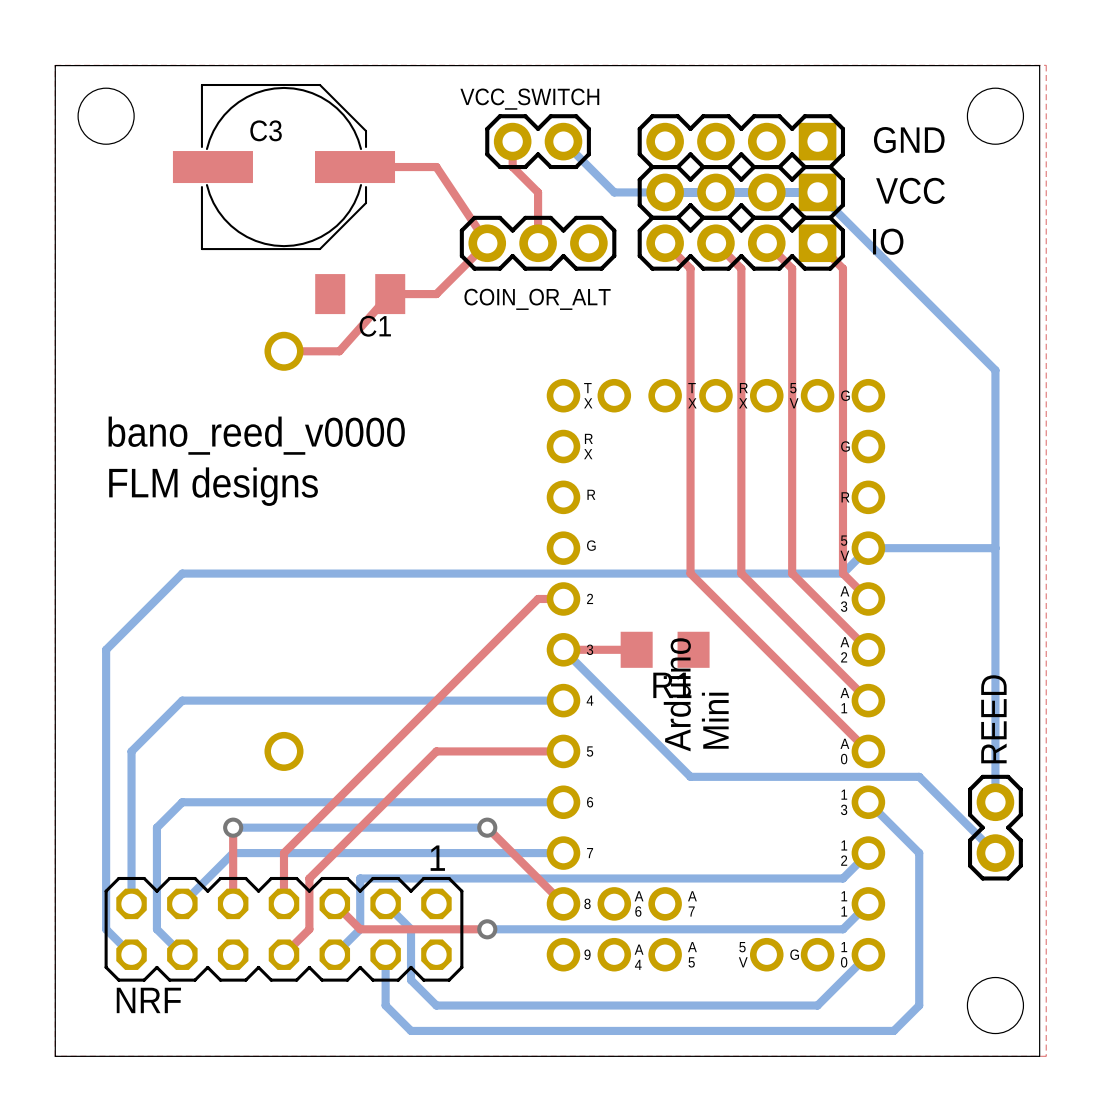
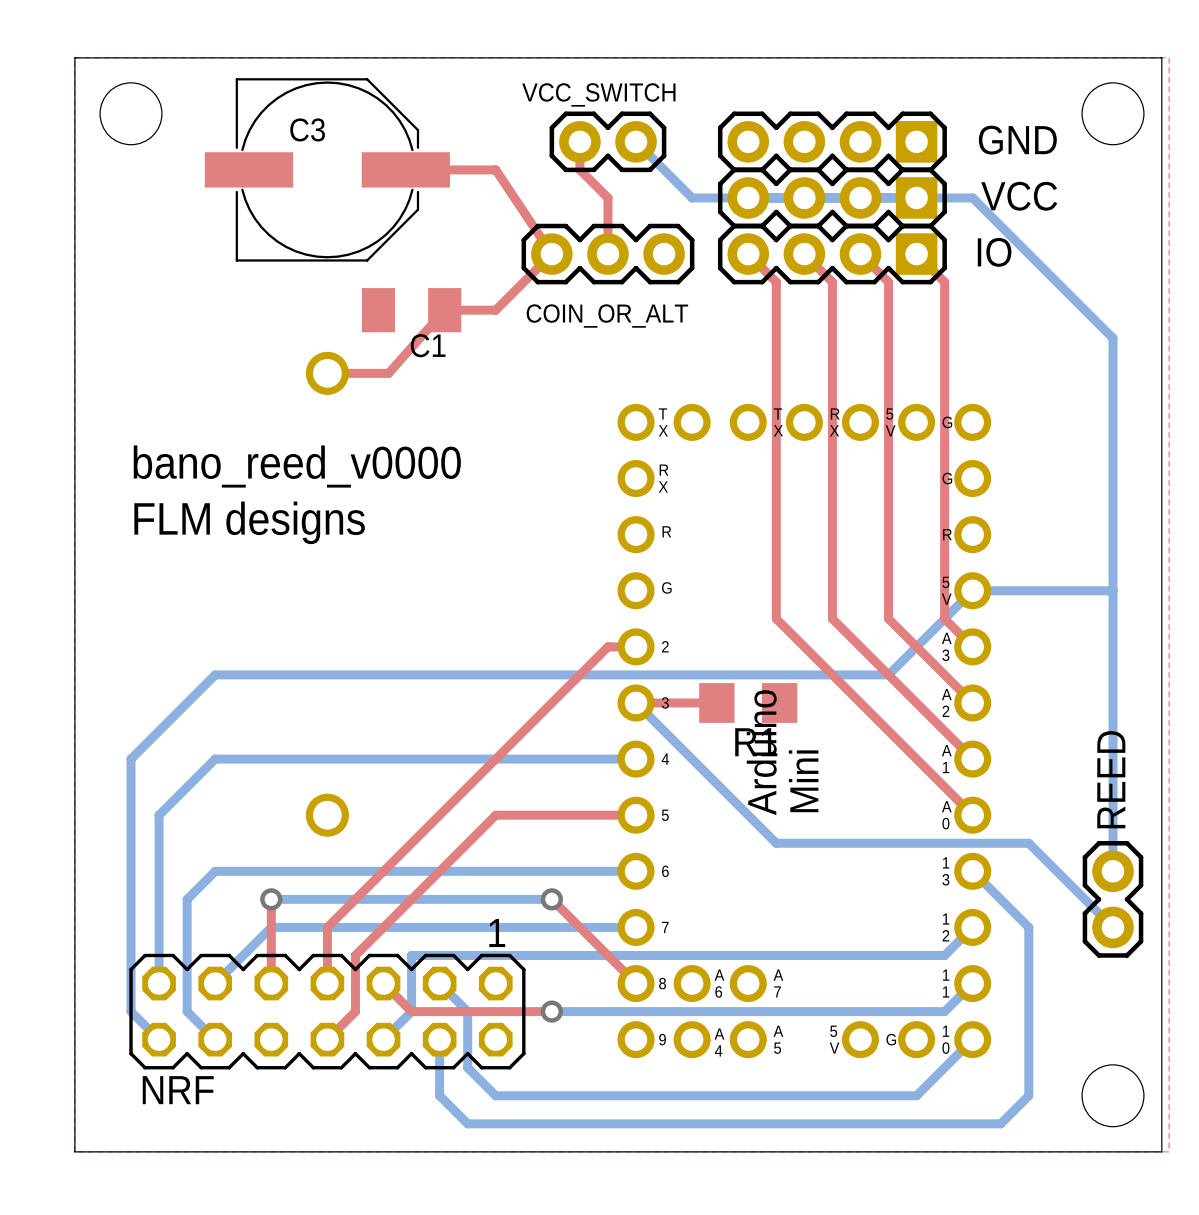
bottom track: (817, 192) (995, 370) -> (916, 197) (972, 197) (1113, 338) (1113, 394)
bottom track: (842, 573) (182, 573) (106, 649) (106, 700) -> (944, 618) (888, 674) (215, 674) (131, 759)

